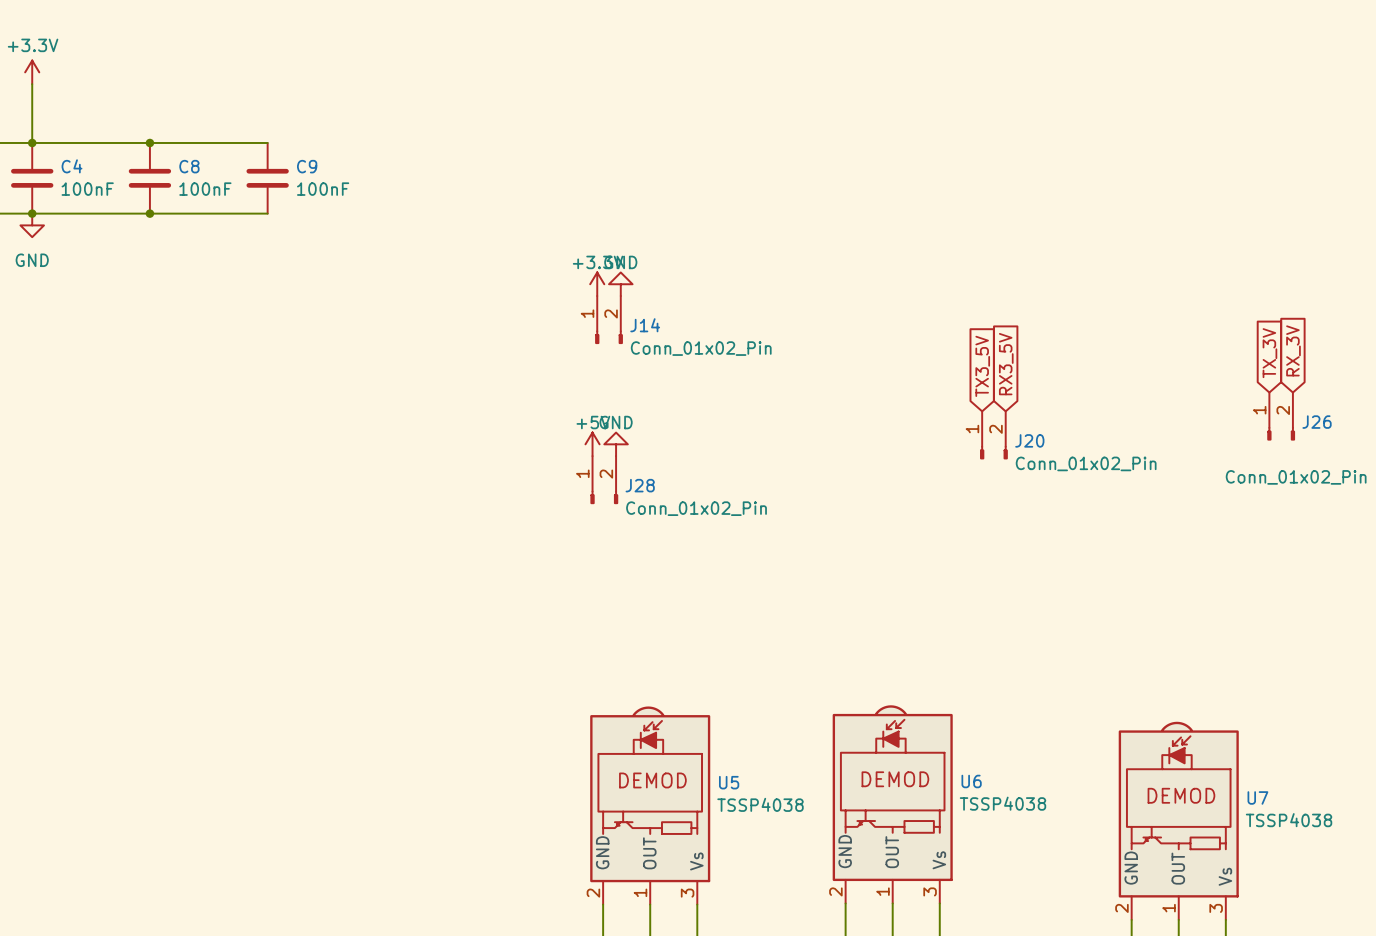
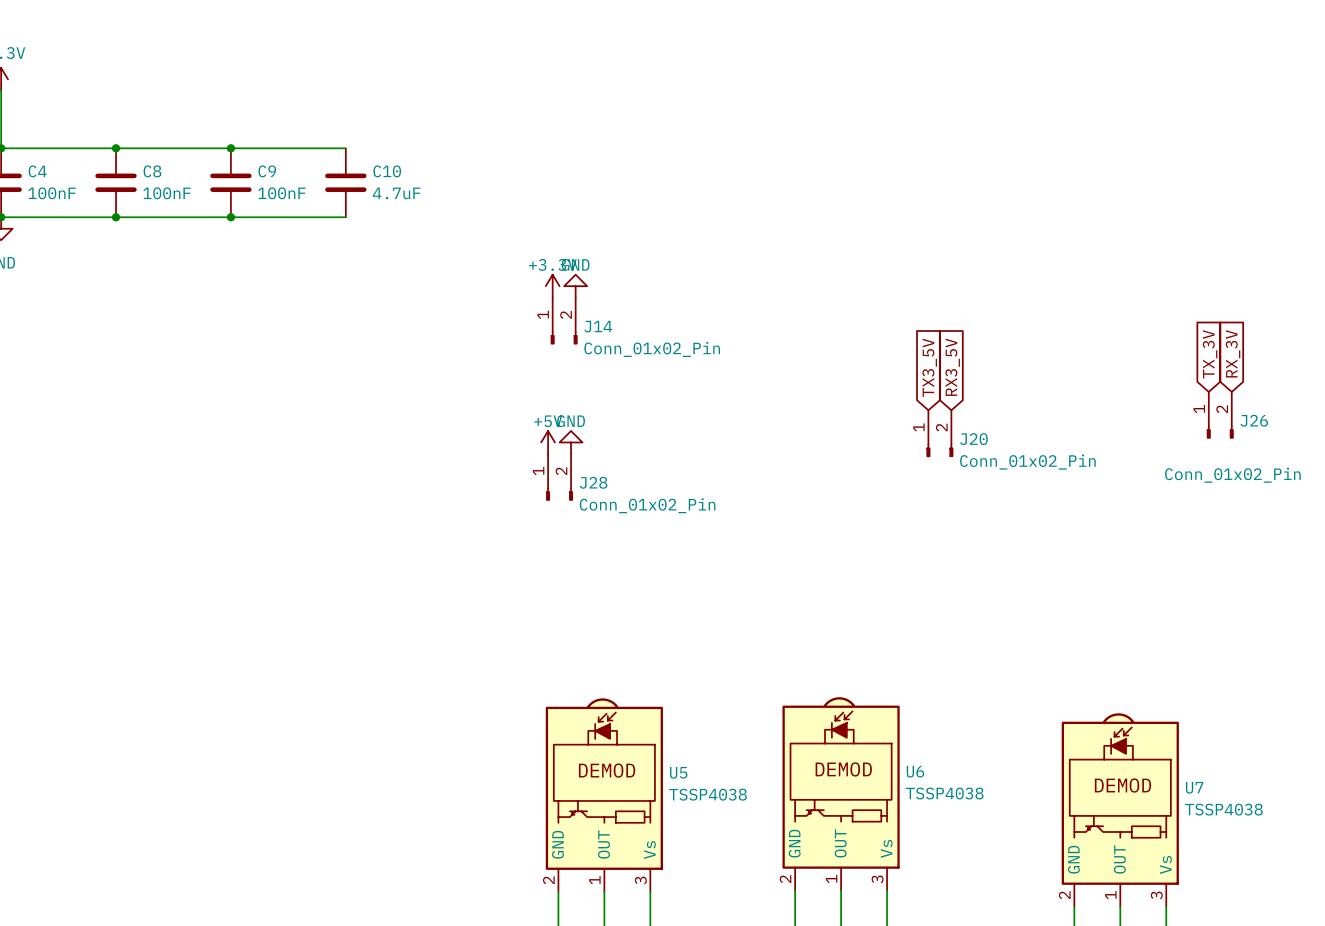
wire: none -> (230, 148) (345, 148)
junction: none -> (230, 148)
C10: none -> 4.7uF (345, 182)
wire: none -> (230, 217) (345, 217)
junction: none -> (230, 217)

